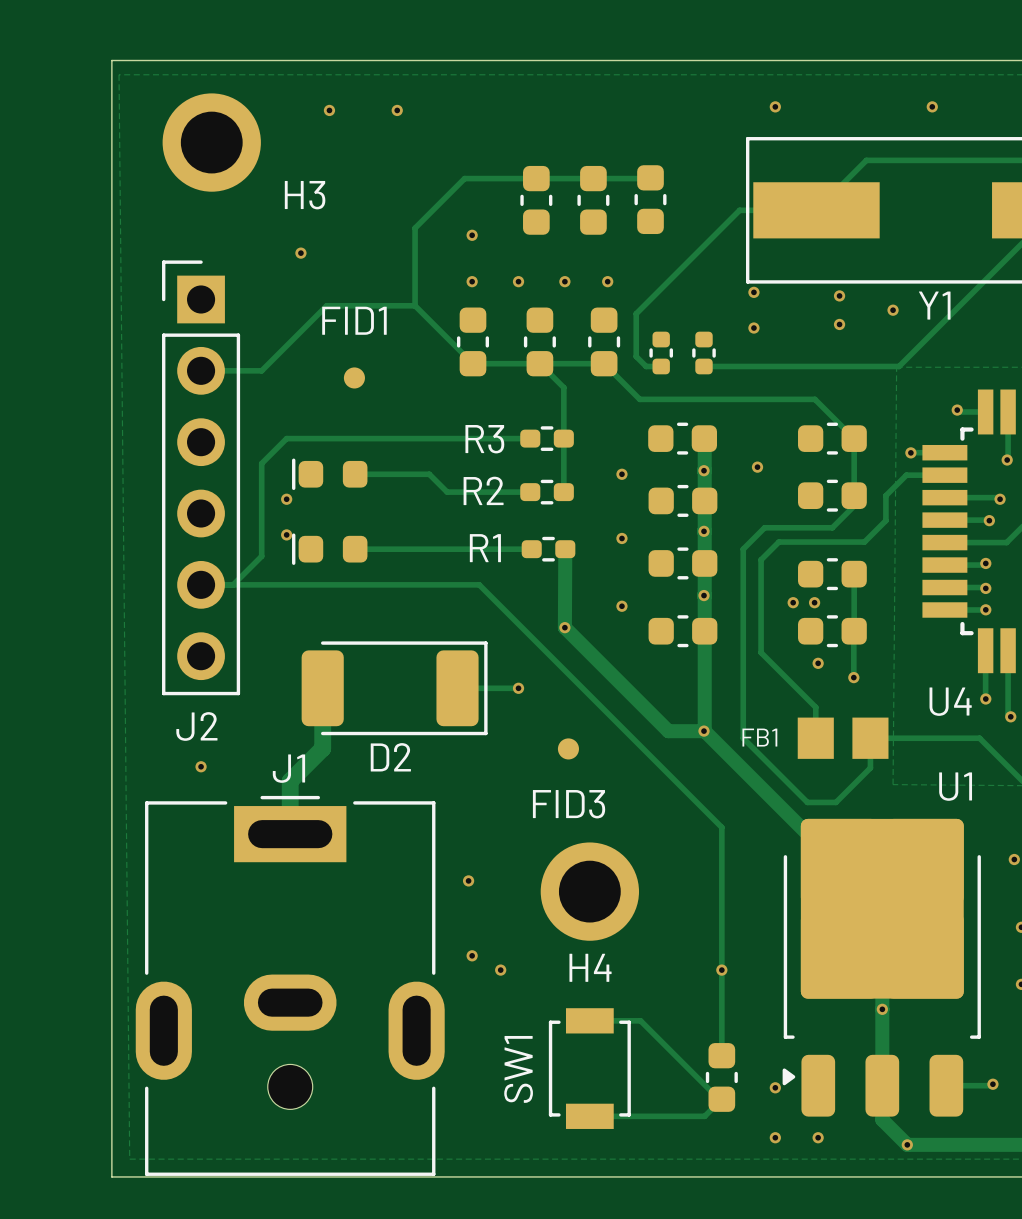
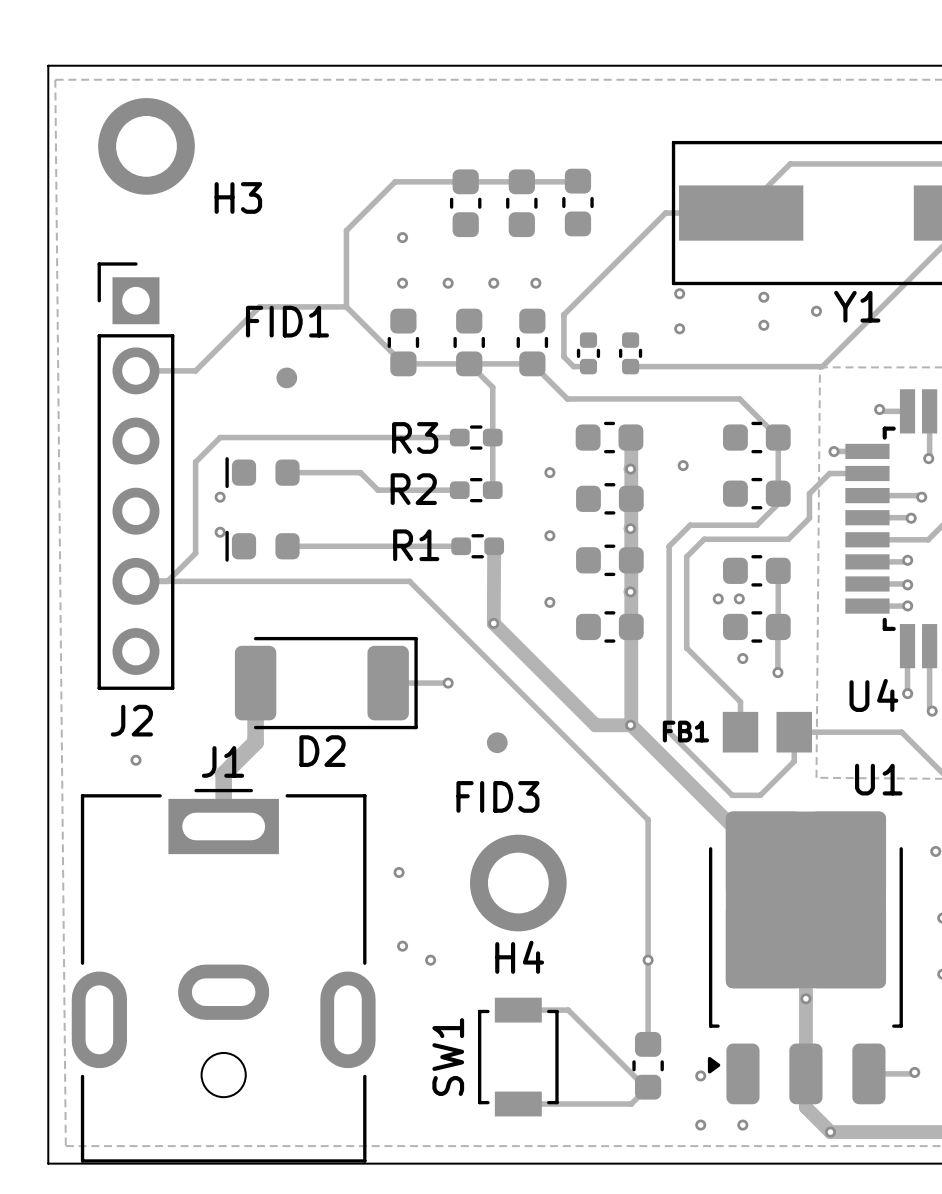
via: (775, 106) -> none
via: (932, 106) -> none
via: (329, 110) -> none
via: (397, 110) -> none
via: (300, 253) -> none

